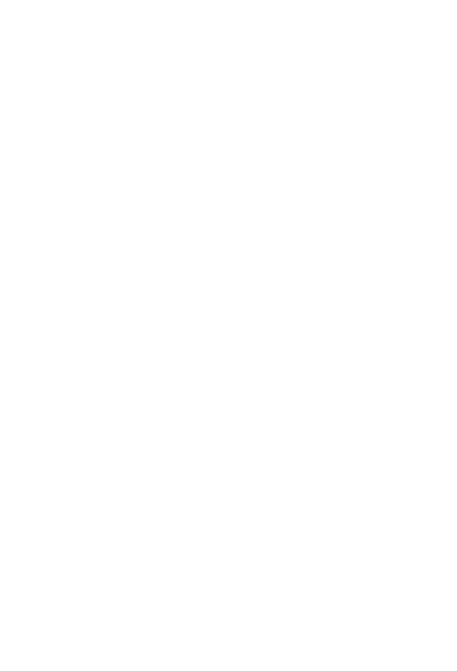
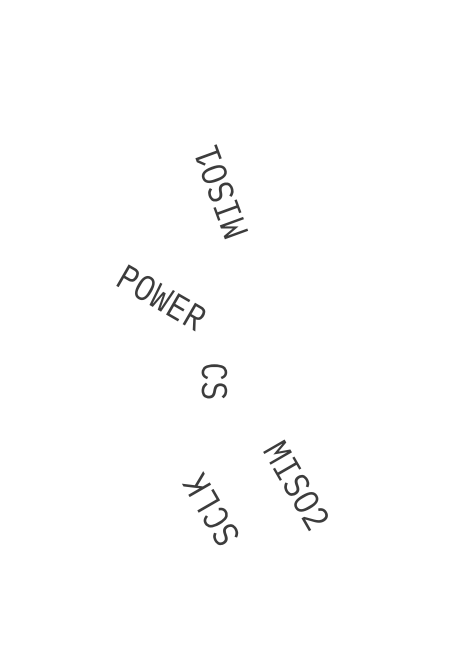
text: none -> MISO1 (221, 191)
text: none -> POWER (160, 297)
text: none -> CS (214, 381)
text: none -> MISO2 (295, 485)
text: none -> SCLK (210, 508)

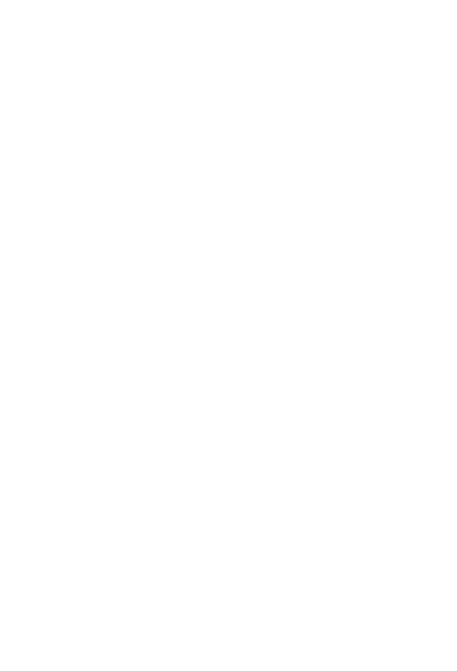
text: MISO1 (221, 191) -> none
text: POWER (160, 297) -> none
text: CS (214, 381) -> none
text: MISO2 (295, 485) -> none
text: SCLK (210, 508) -> none

